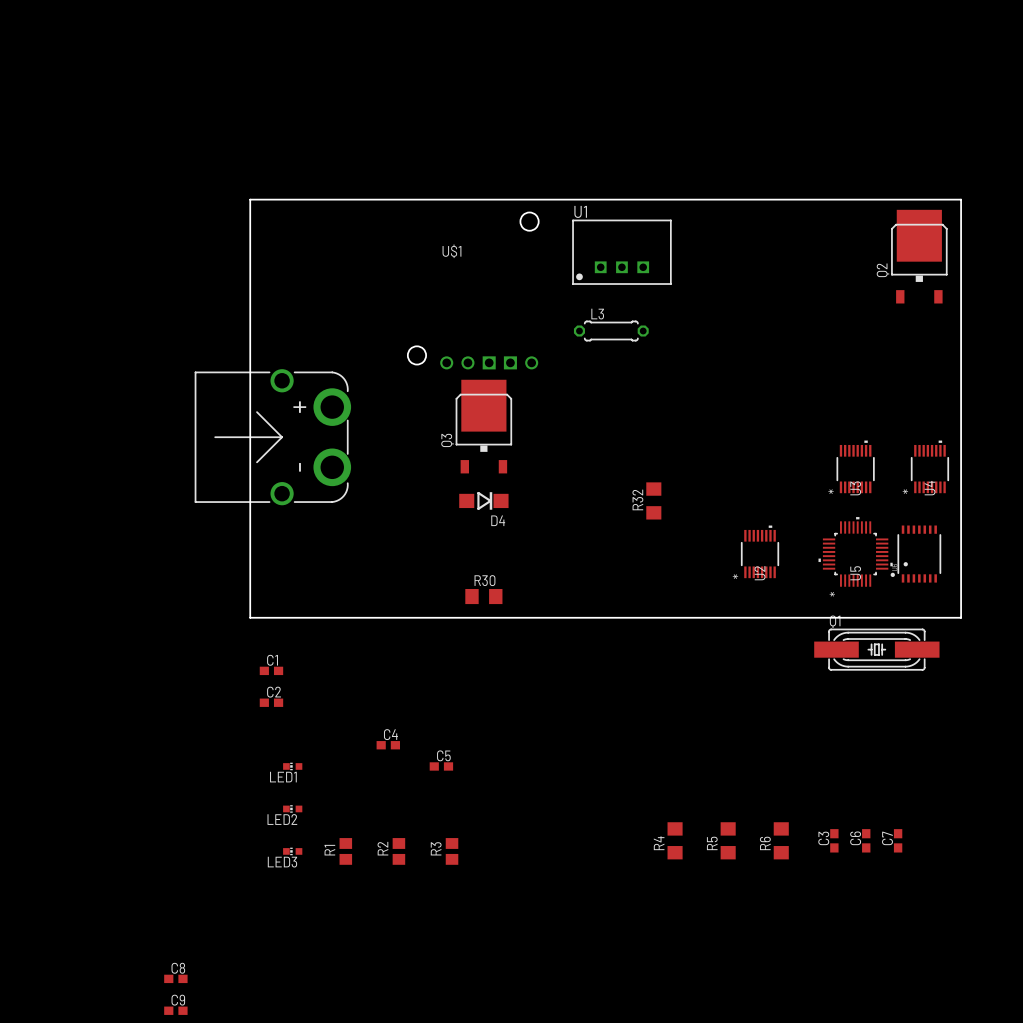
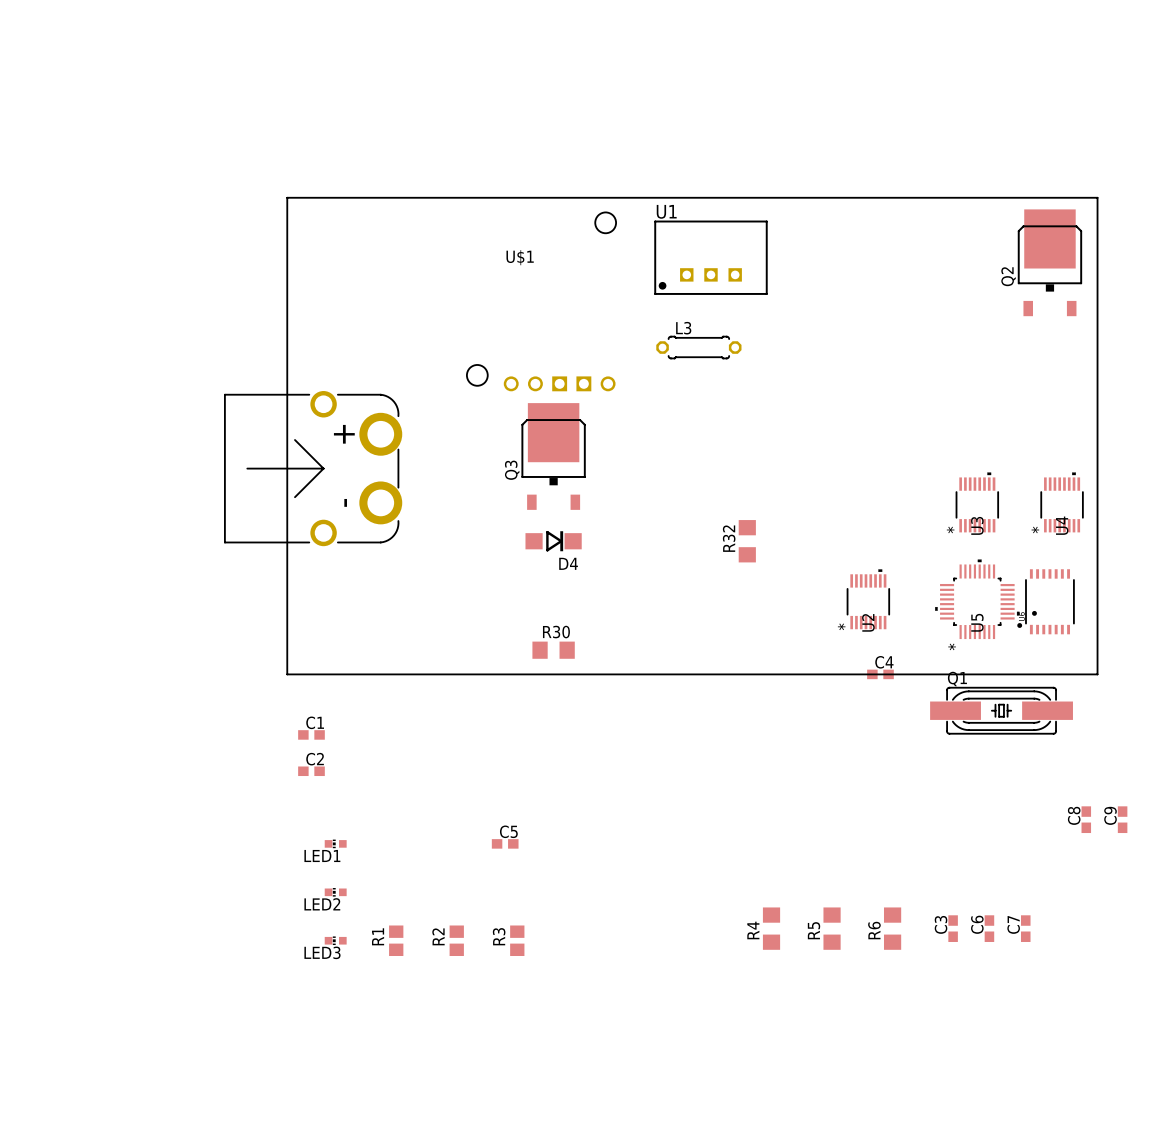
C4 position: (388, 745) -> (880, 674)
C8 name position: C8 (178, 968) -> C8 (1074, 815)
C8 rotation: 0° (175, 978) -> 90° clockwise (1086, 819)
C8 position: (175, 978) -> (1086, 819)
C9 name position: C9 (178, 1000) -> C9 (1110, 815)
C9 rotation: 0° (175, 1010) -> 90° clockwise (1122, 819)
C9 position: (175, 1010) -> (1122, 819)

